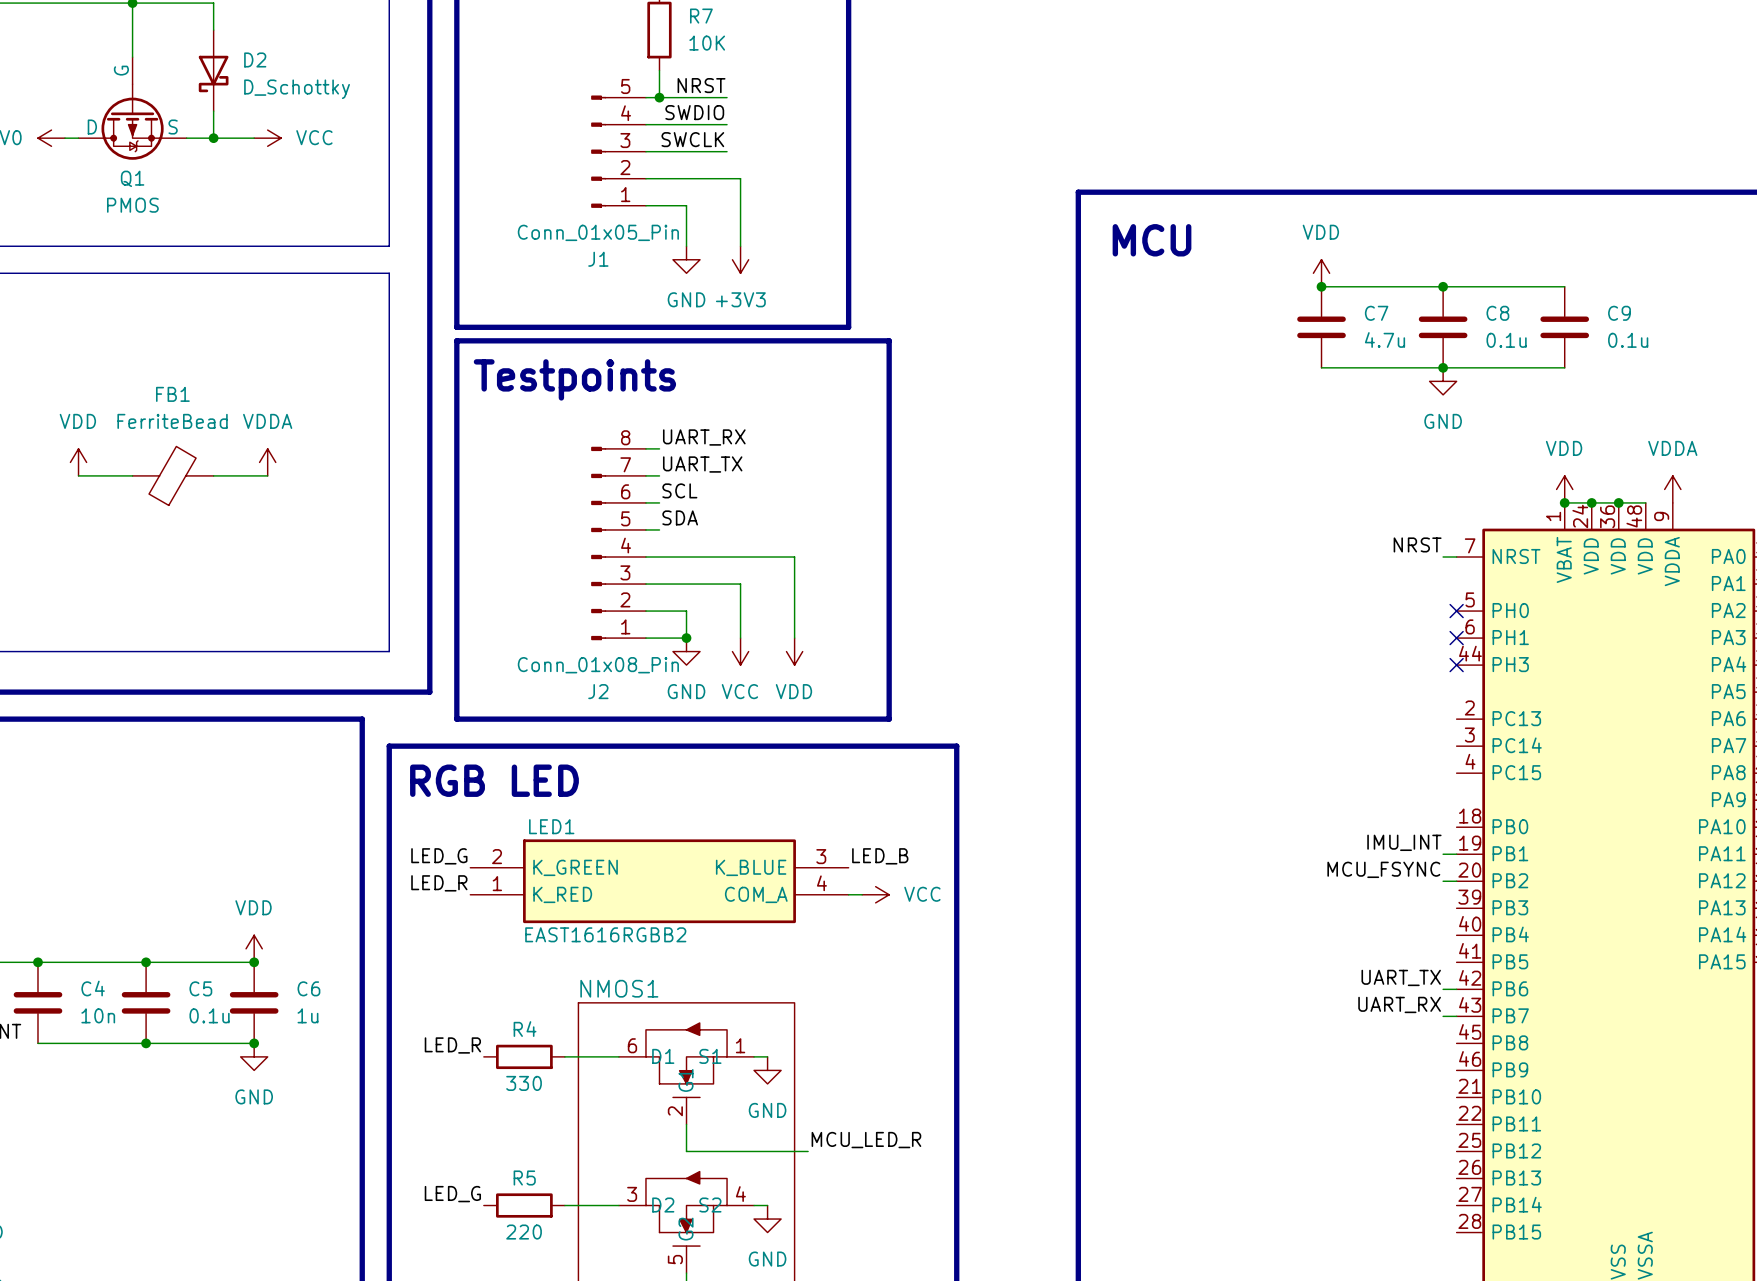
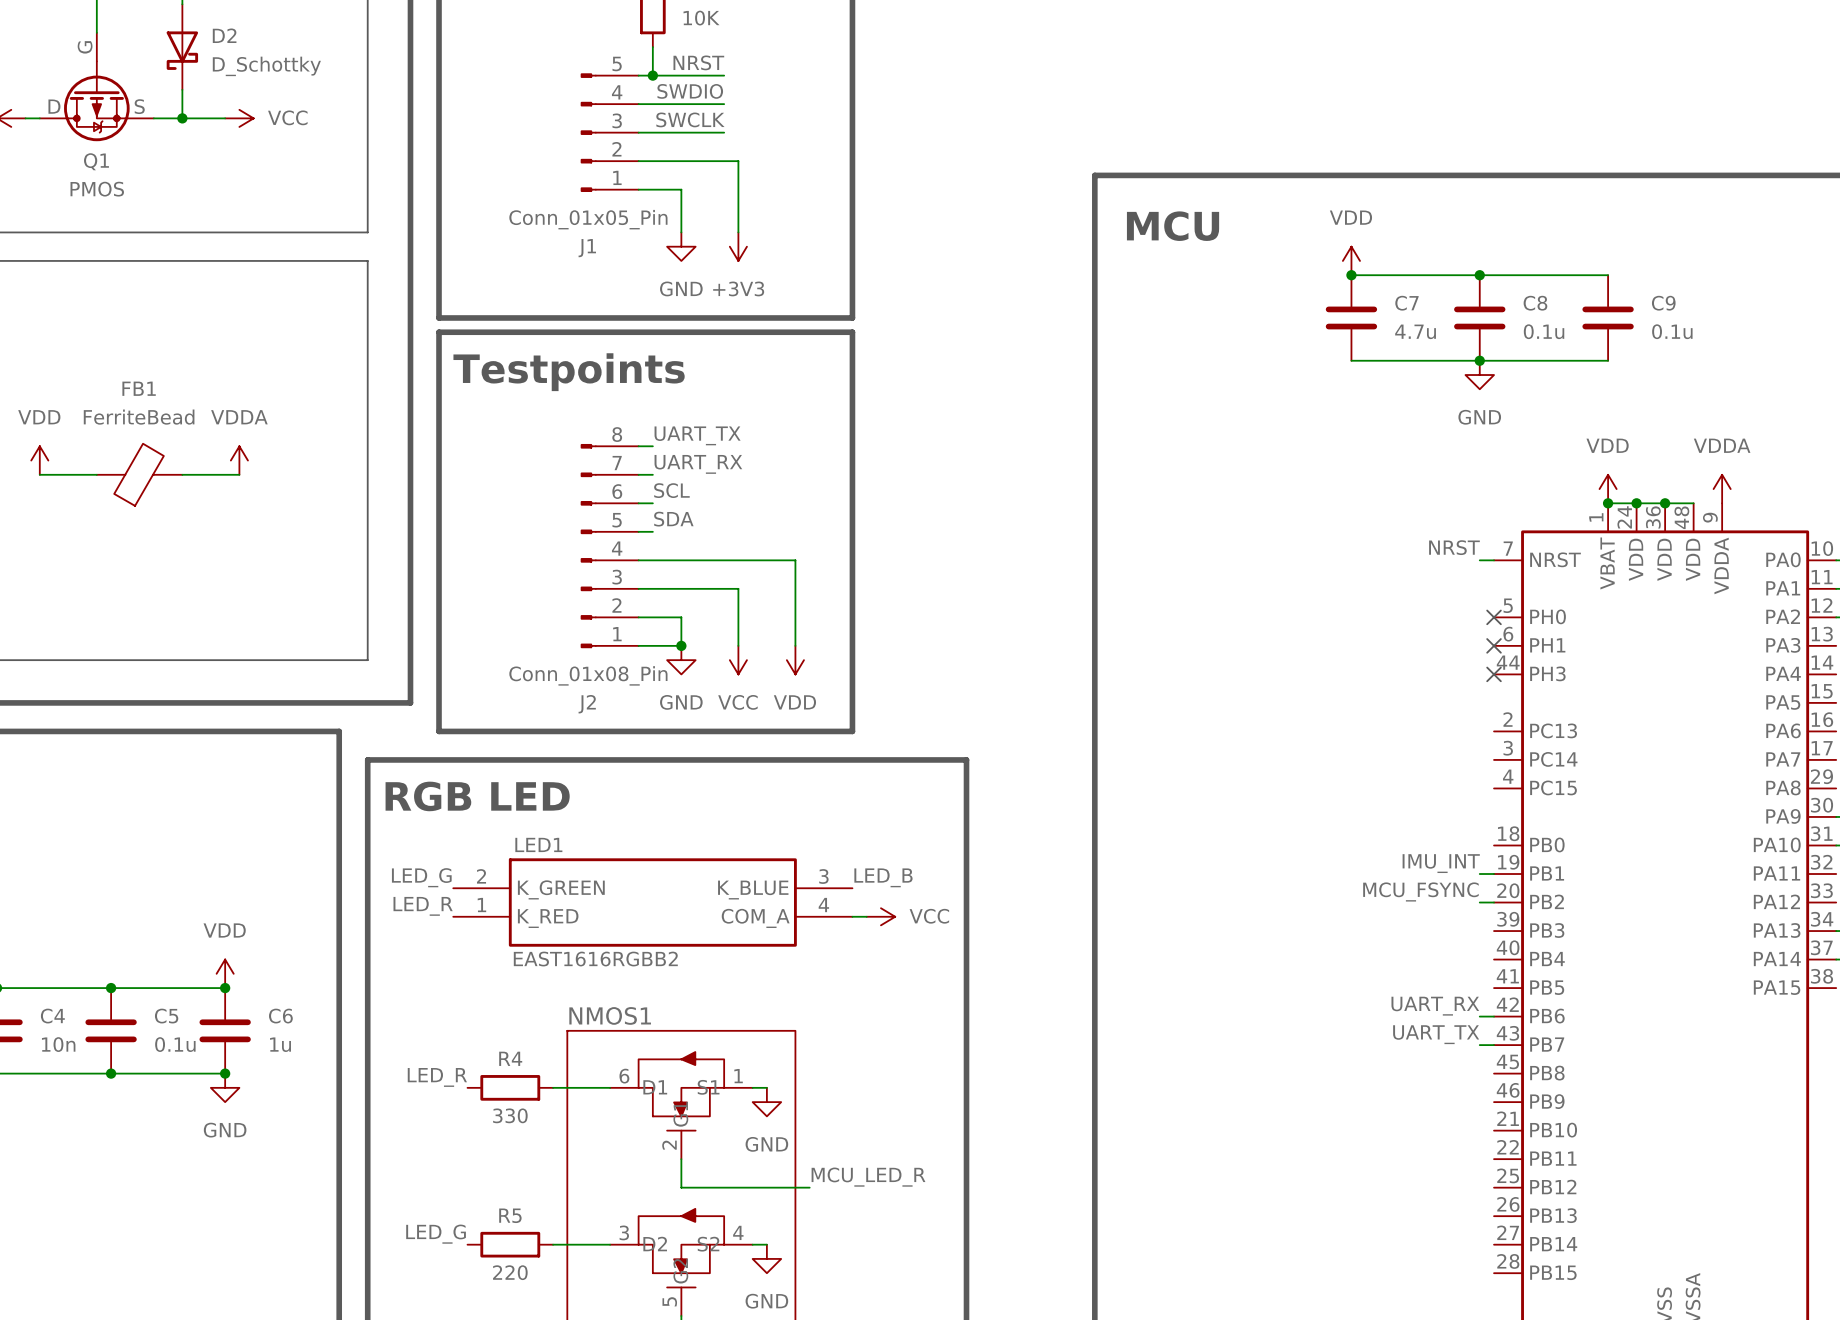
line: (848, 340) (889, 340) (889, 719) (848, 719) -> (852, 332) (852, 731)
label: UART_RX (704, 437) -> UART_TX (697, 435)
label: UART_TX (702, 464) -> UART_RX (698, 464)
label: UART_TX (1401, 977) -> UART_RX (1435, 1006)
label: UART_RX (1399, 1004) -> UART_TX (1436, 1034)

